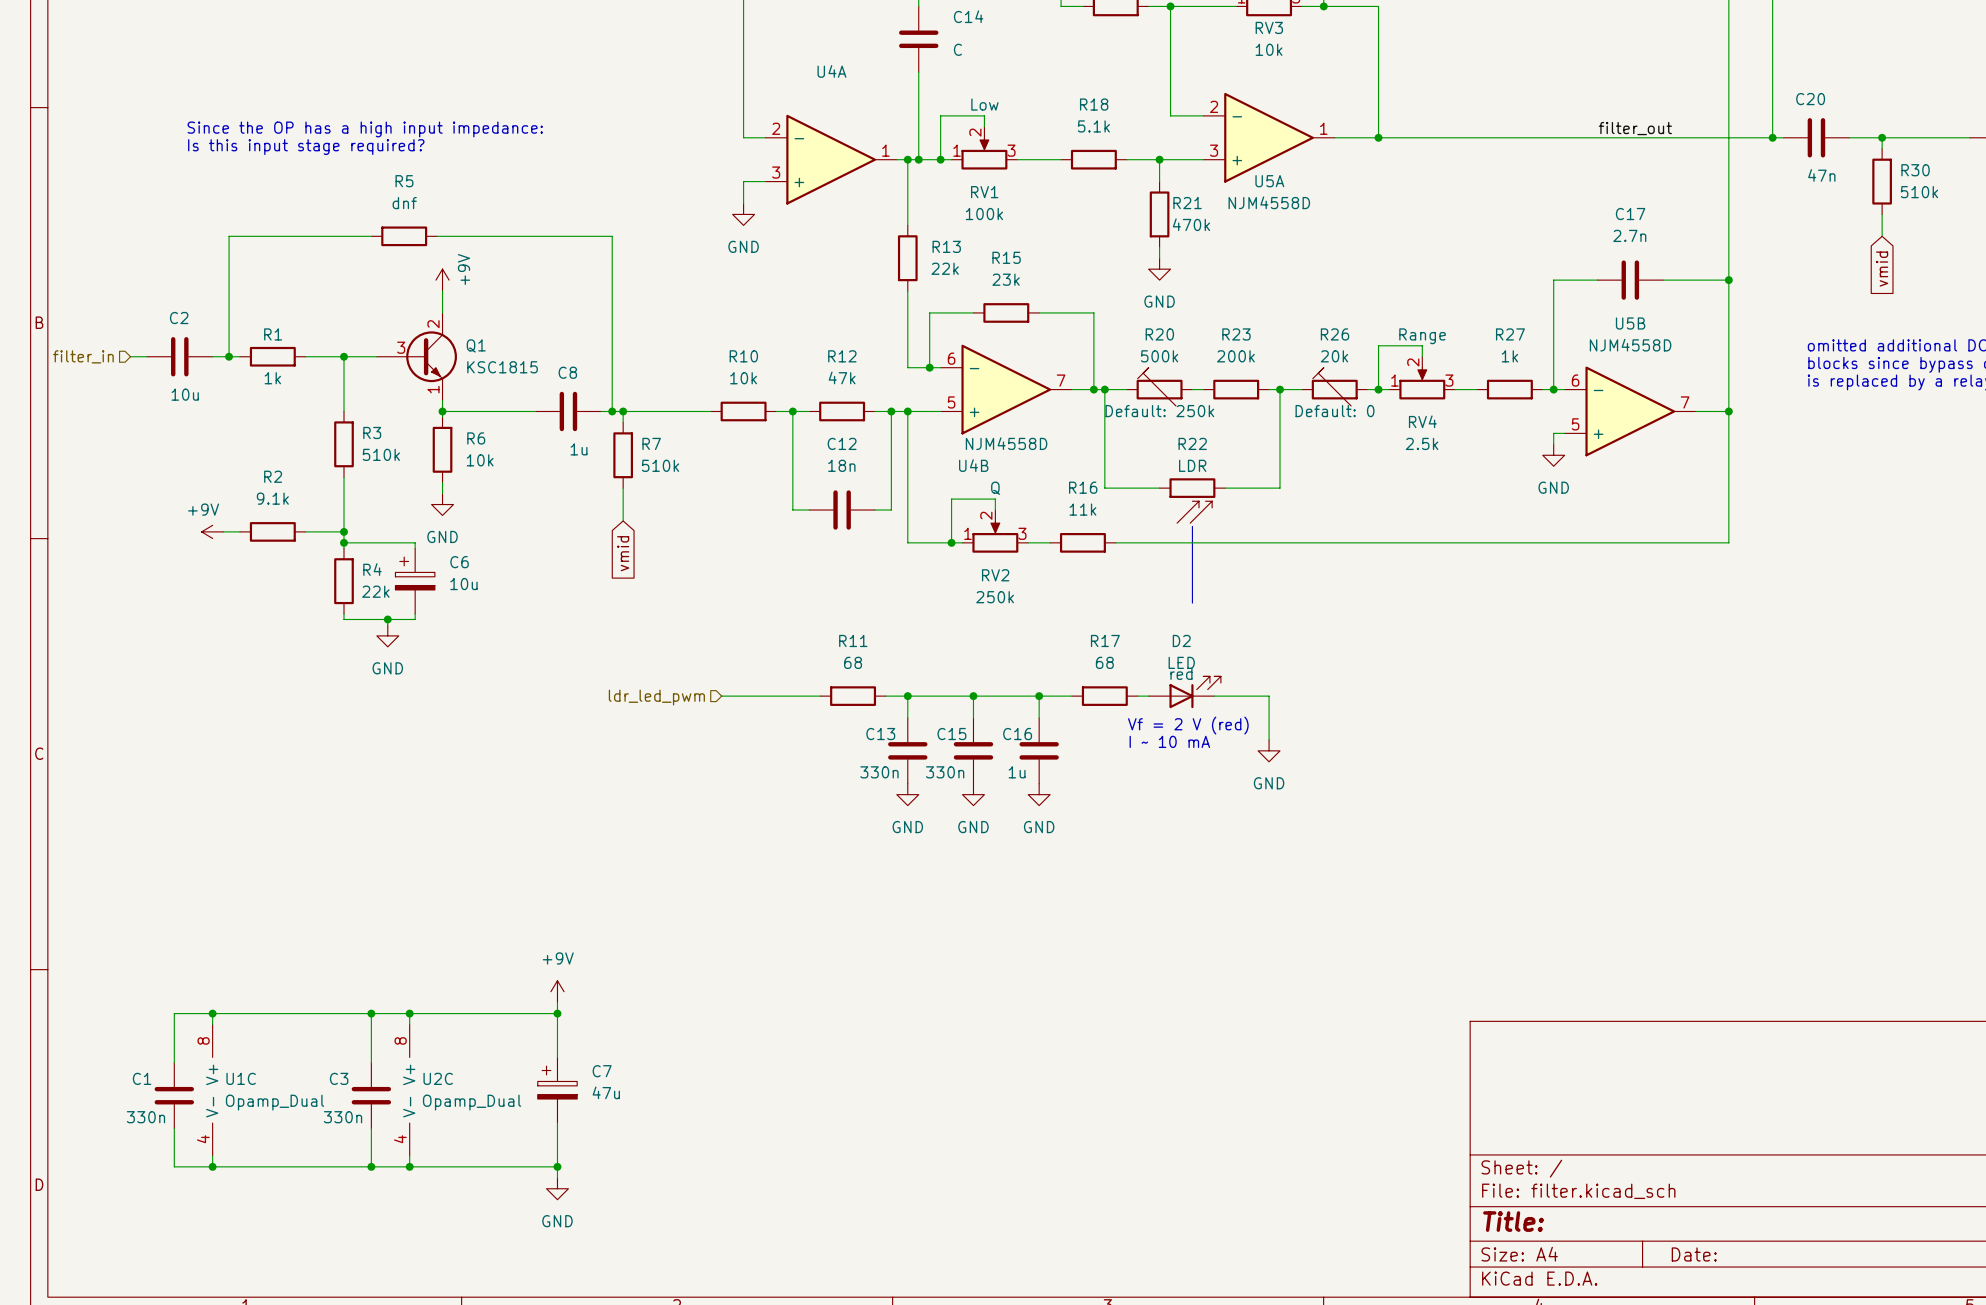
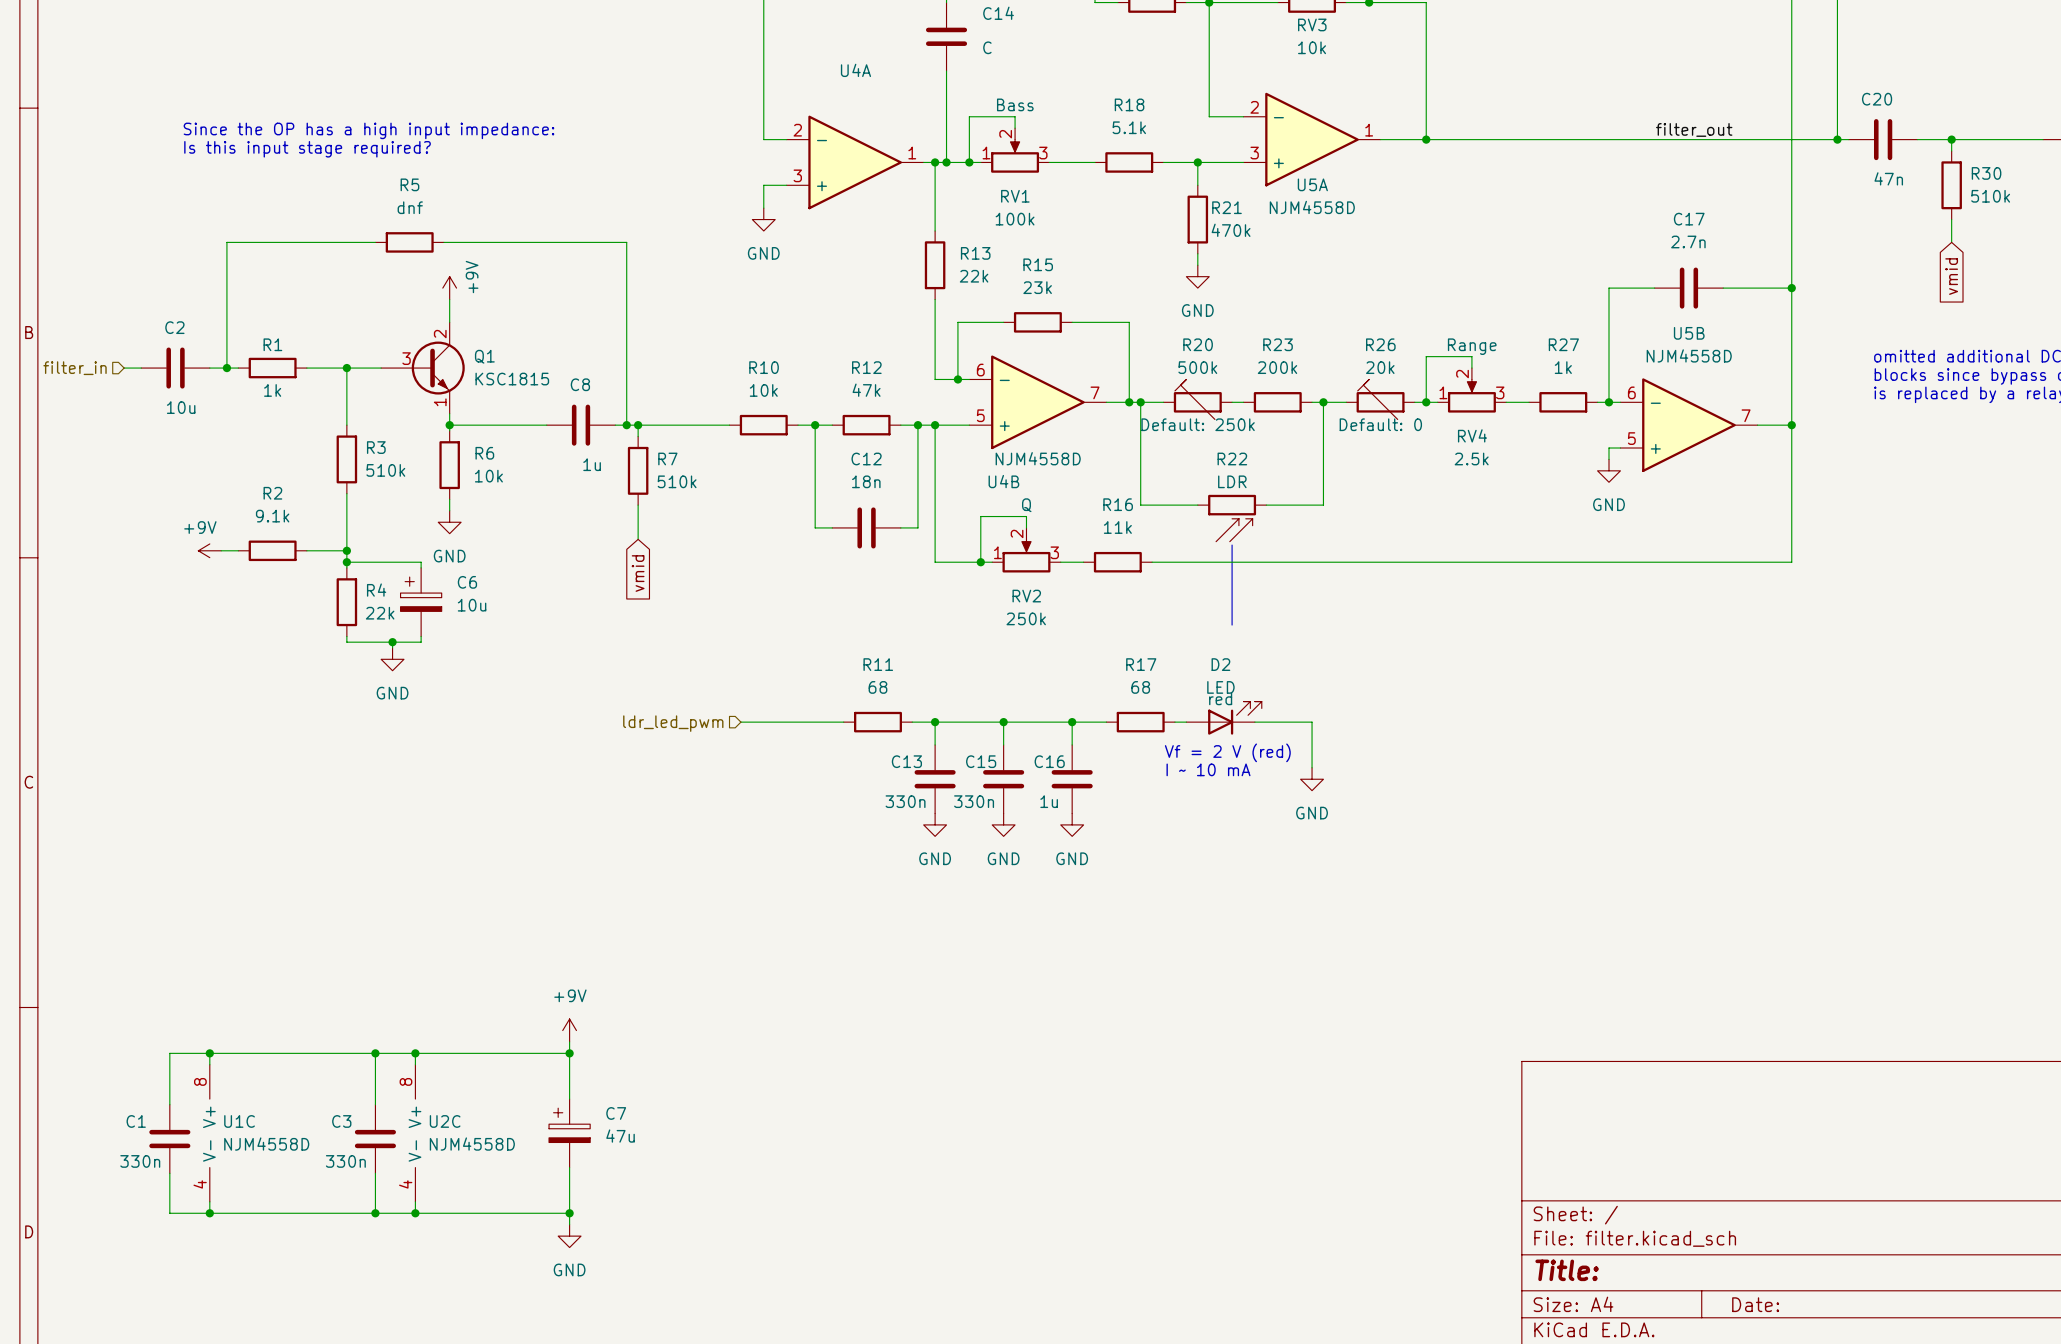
RV1 text: Low (984, 104) -> Bass (1015, 104)
U1C value: Opamp_Dual (275, 1102) -> NJM4558D (266, 1144)
U2C value: Opamp_Dual (472, 1102) -> NJM4558D (472, 1144)

